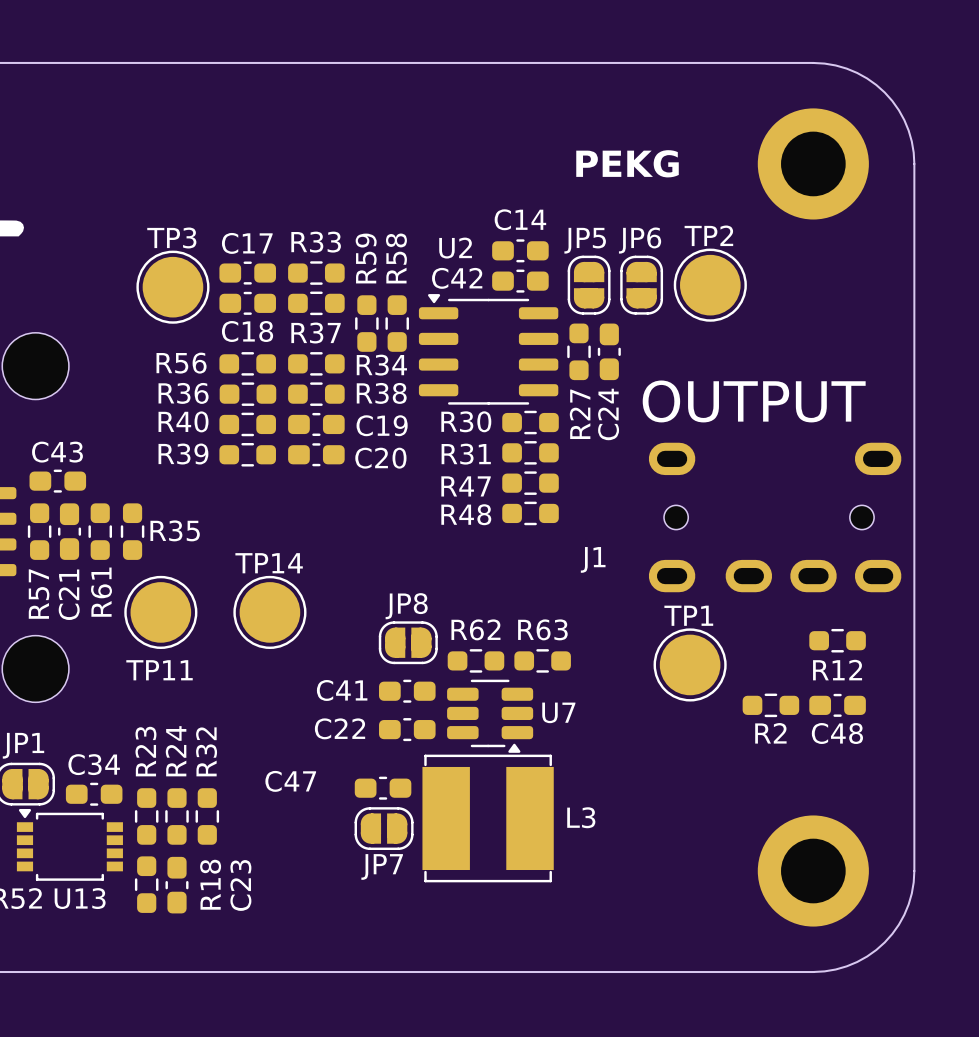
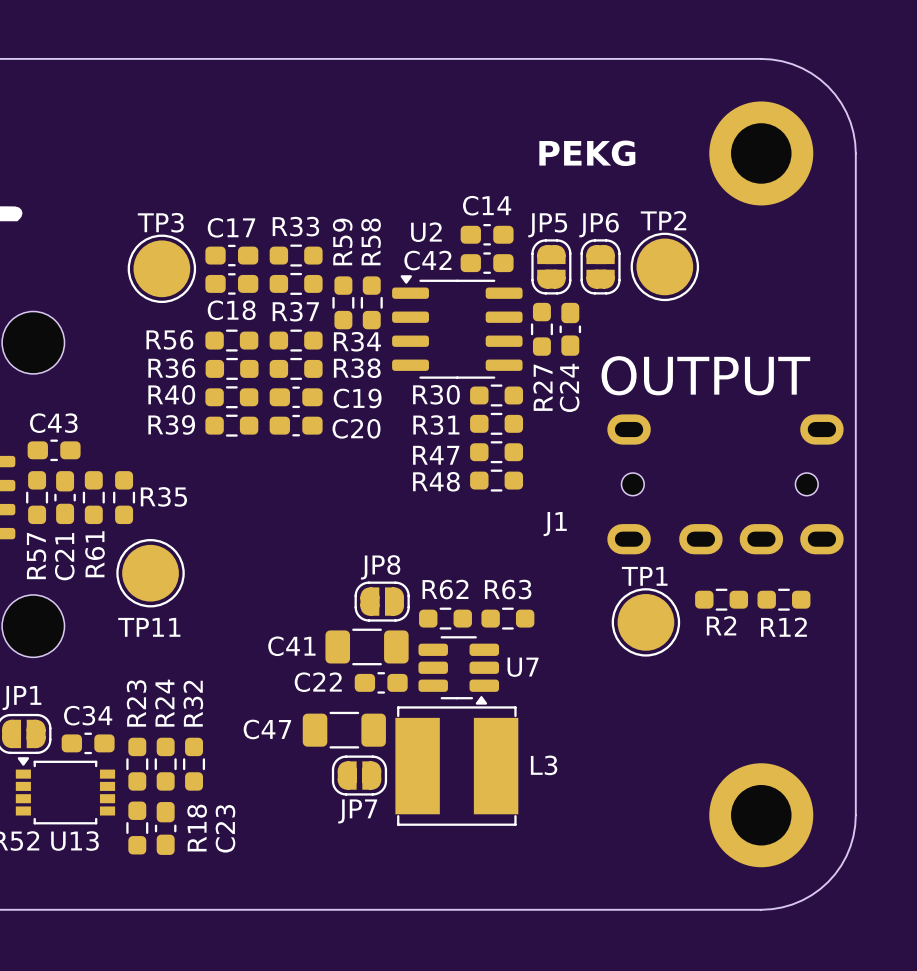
TP14: (269, 612) -> none
C41 footprint: [379, 679, 436, 703] -> [325, 628, 409, 666]
R2 position: (770, 705) -> (721, 599)
C48: (837, 705) -> none
C47 footprint: [354, 776, 412, 800] -> [302, 711, 386, 749]

